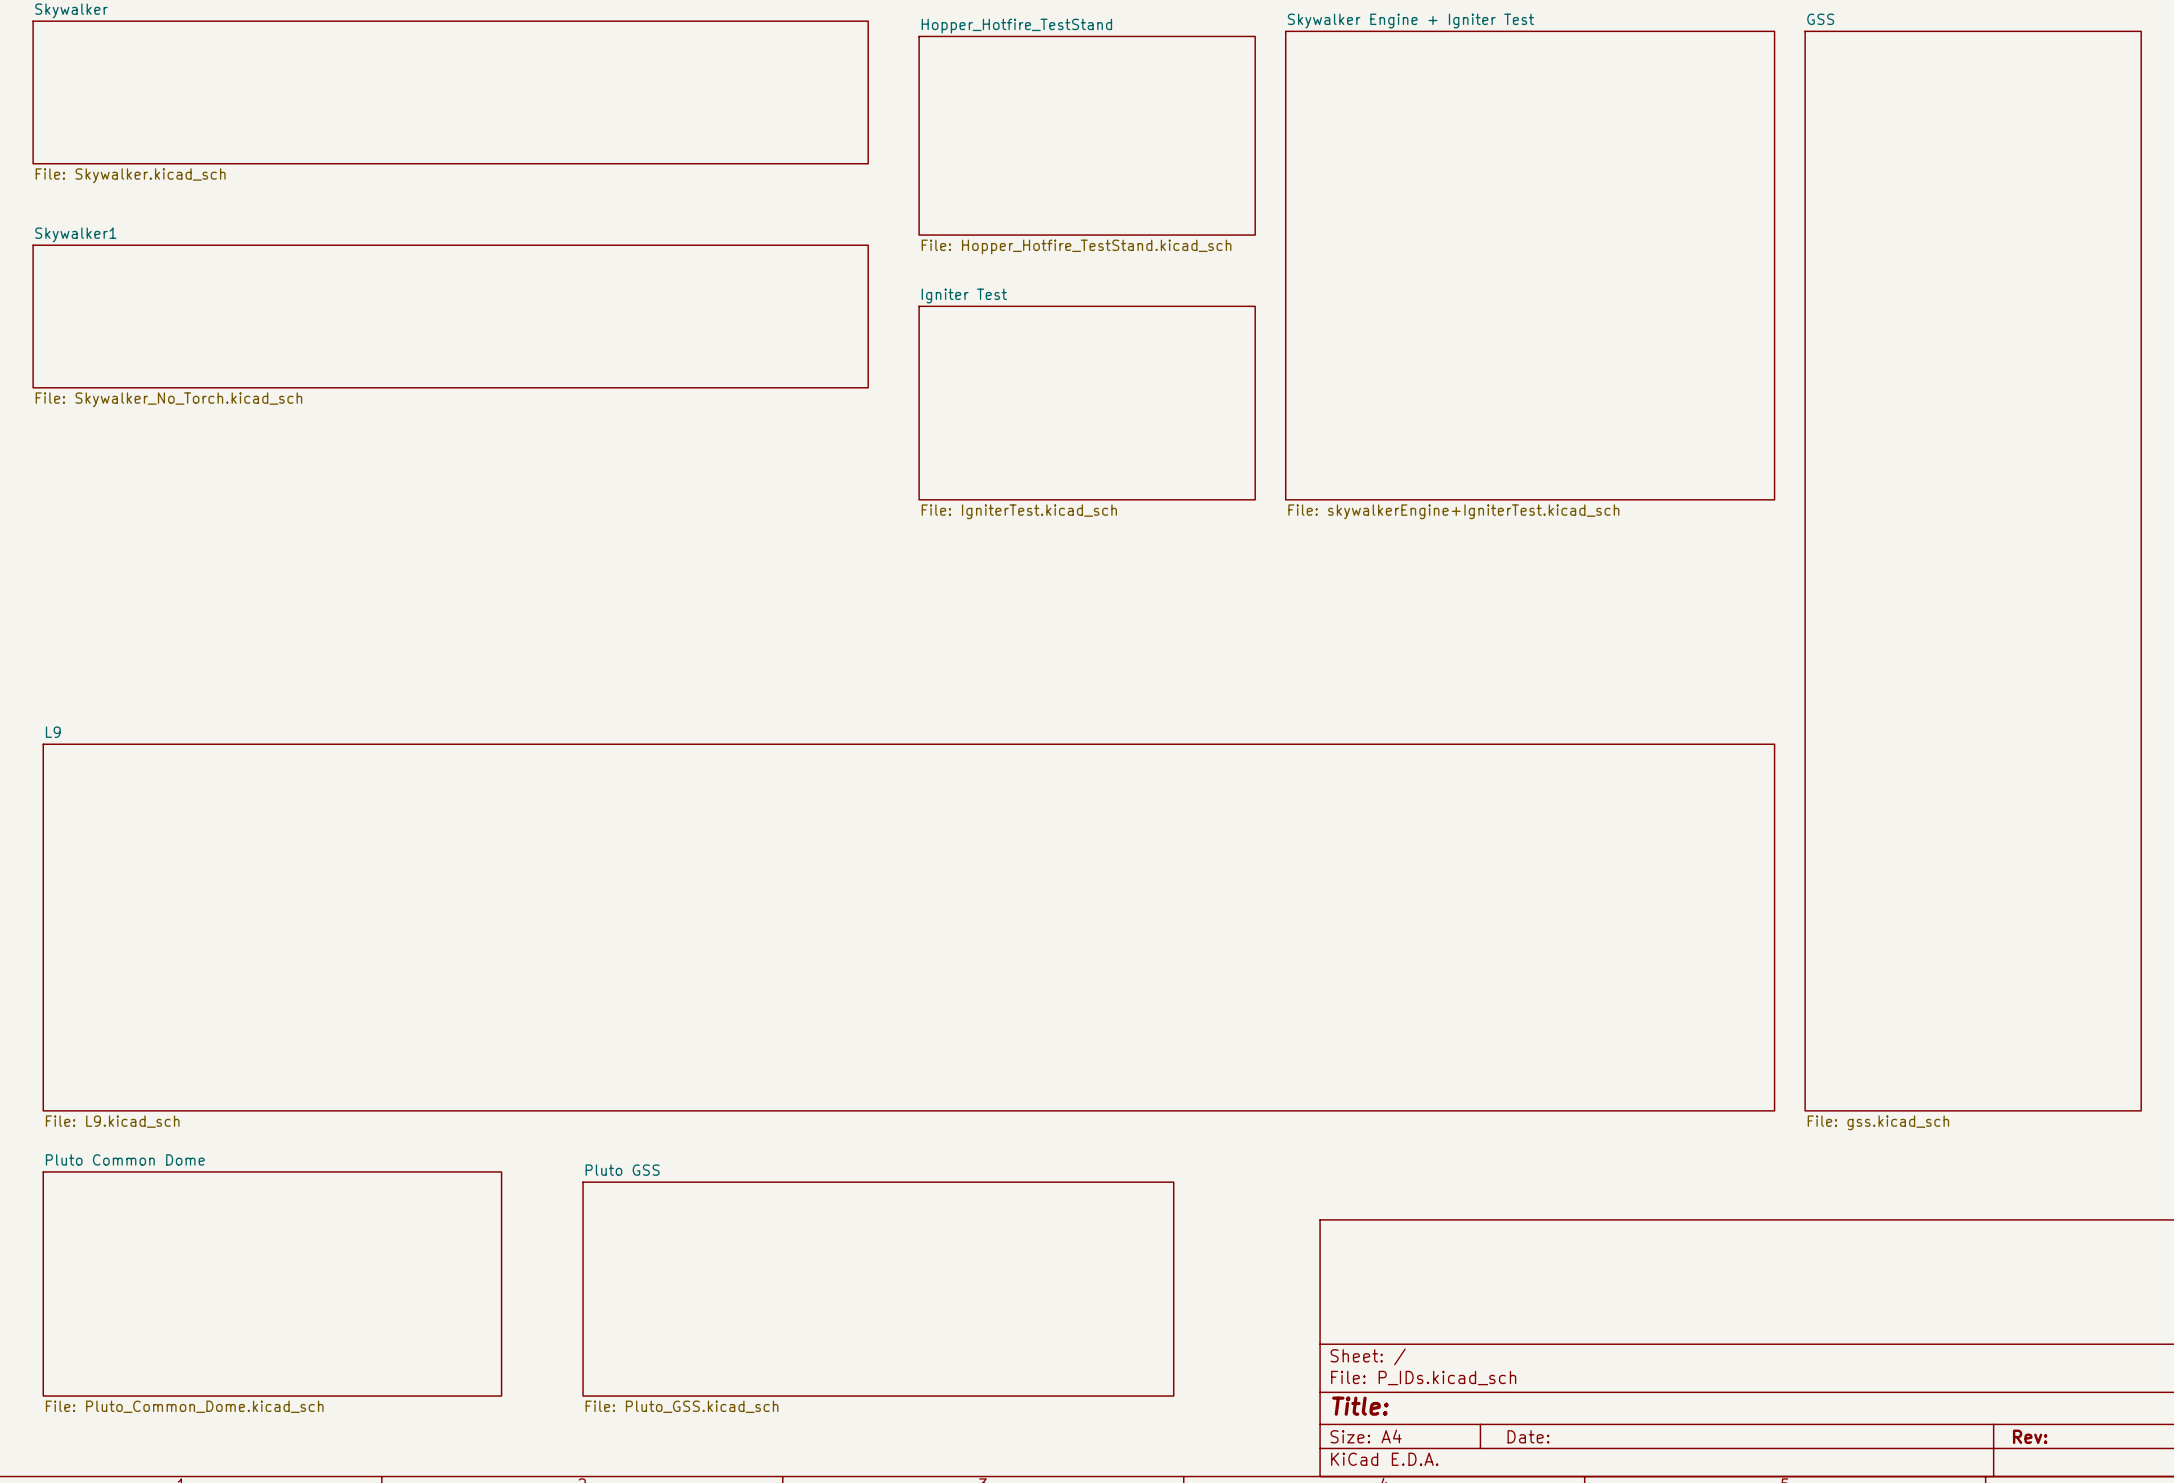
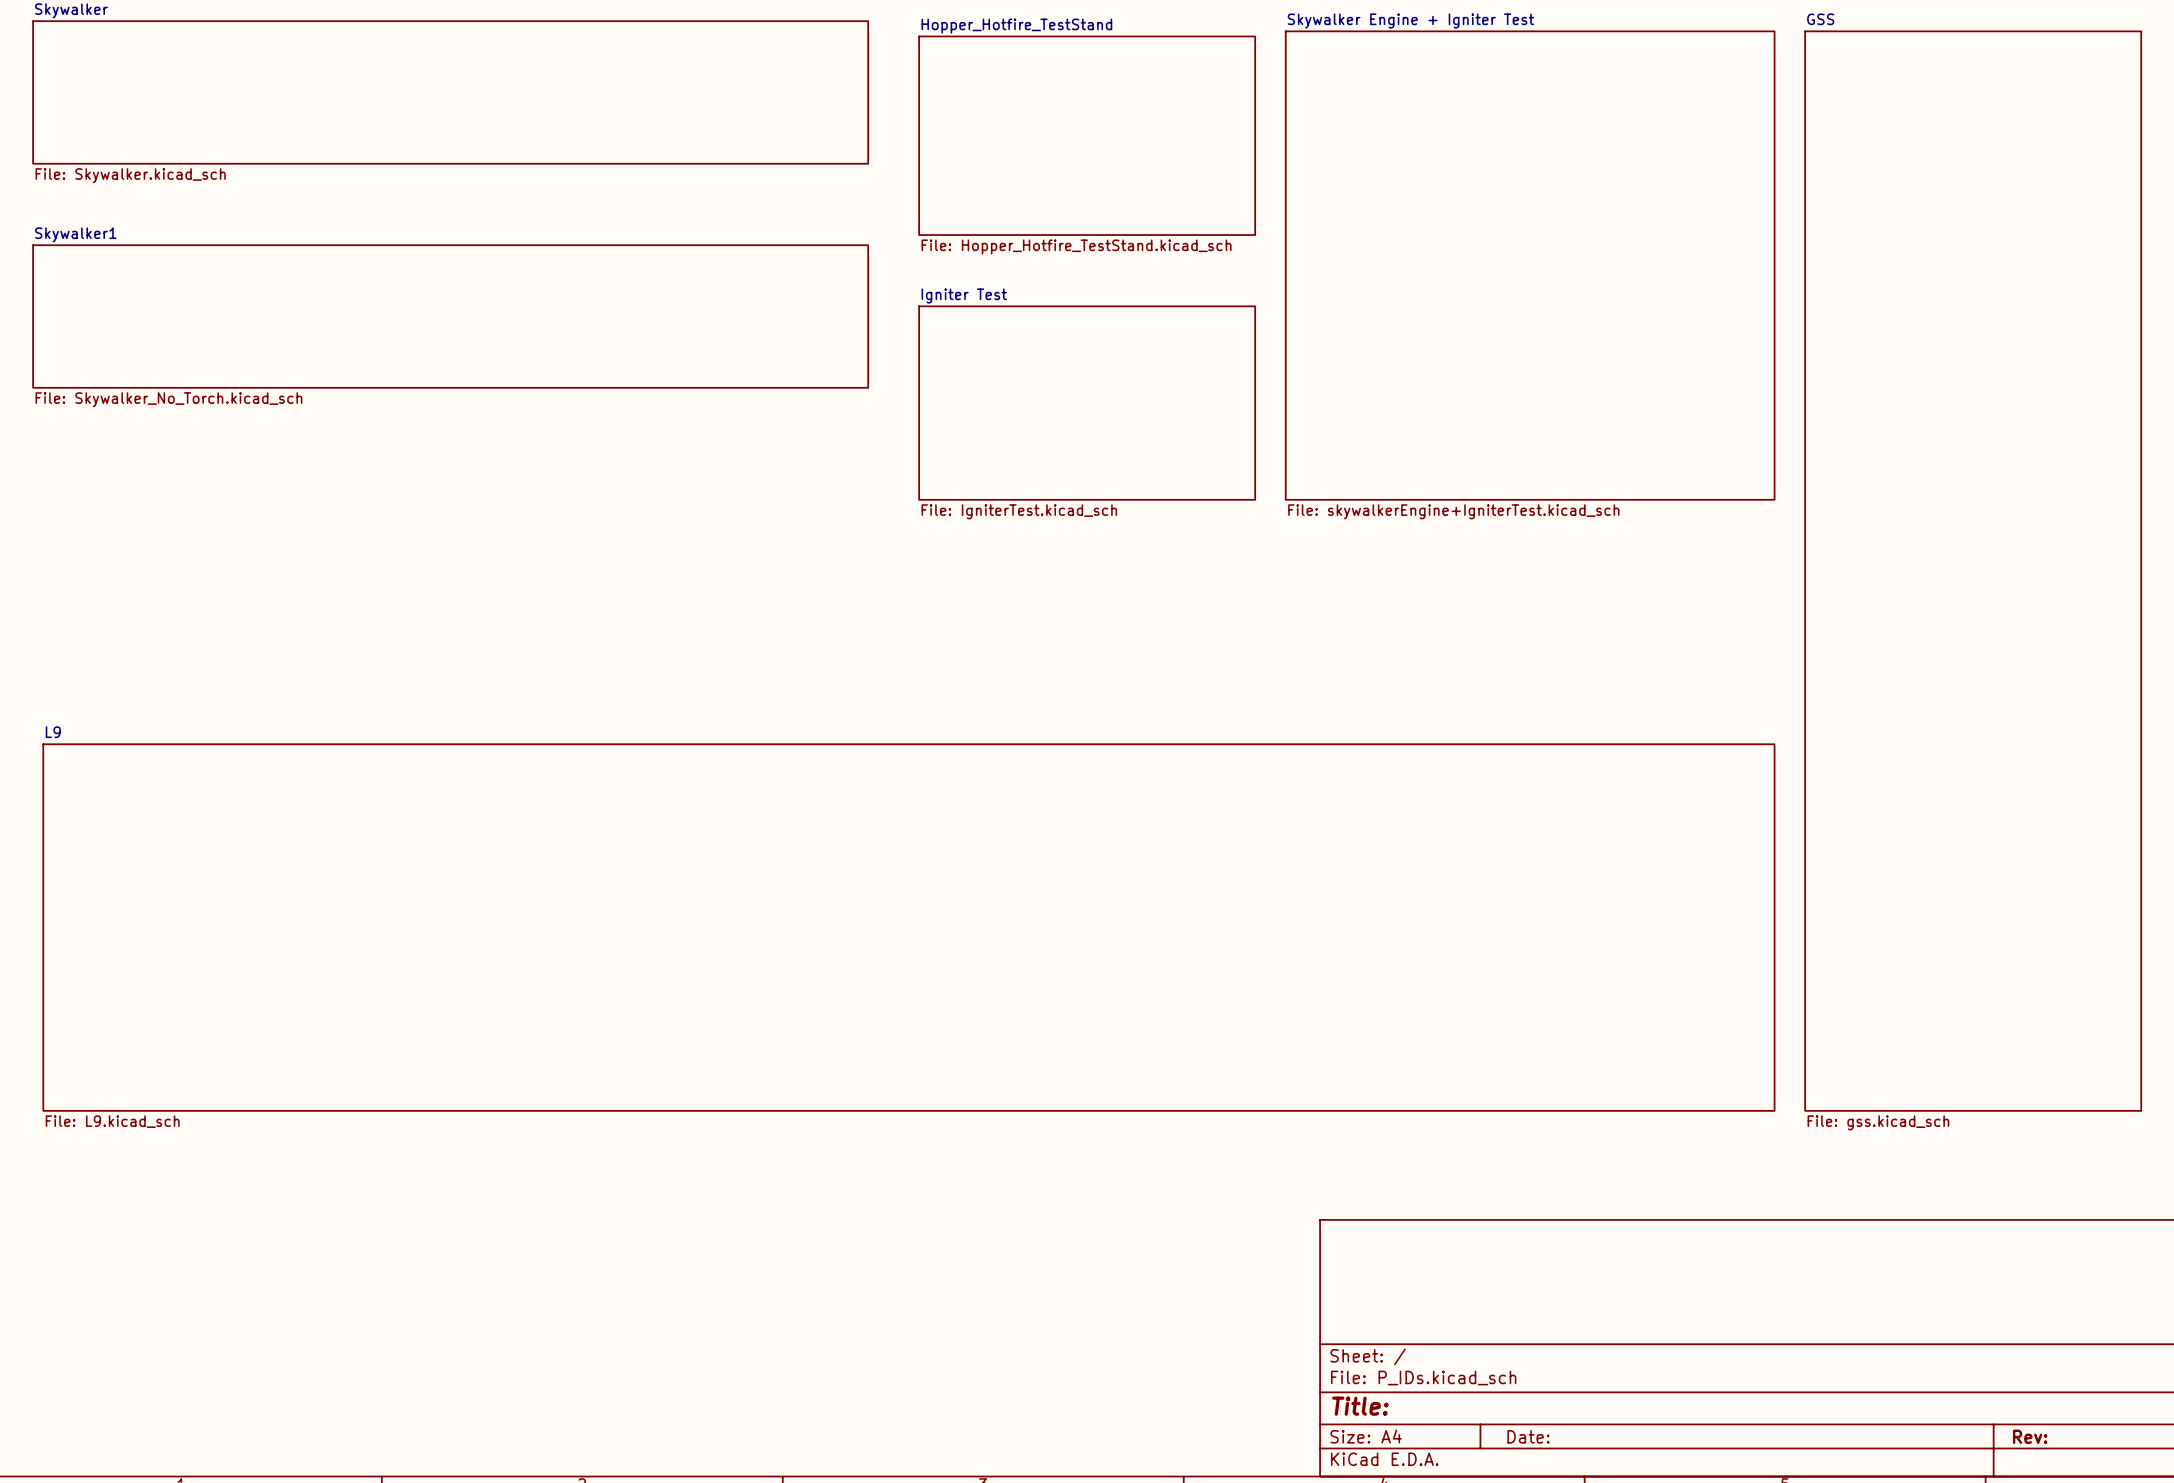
sheet Pluto Common Dome: File: Pluto_Common_Dome.kicad_sch (272, 1284) -> none
sheet Pluto GSS: File: Pluto_GSS.kicad_sch (878, 1289) -> none

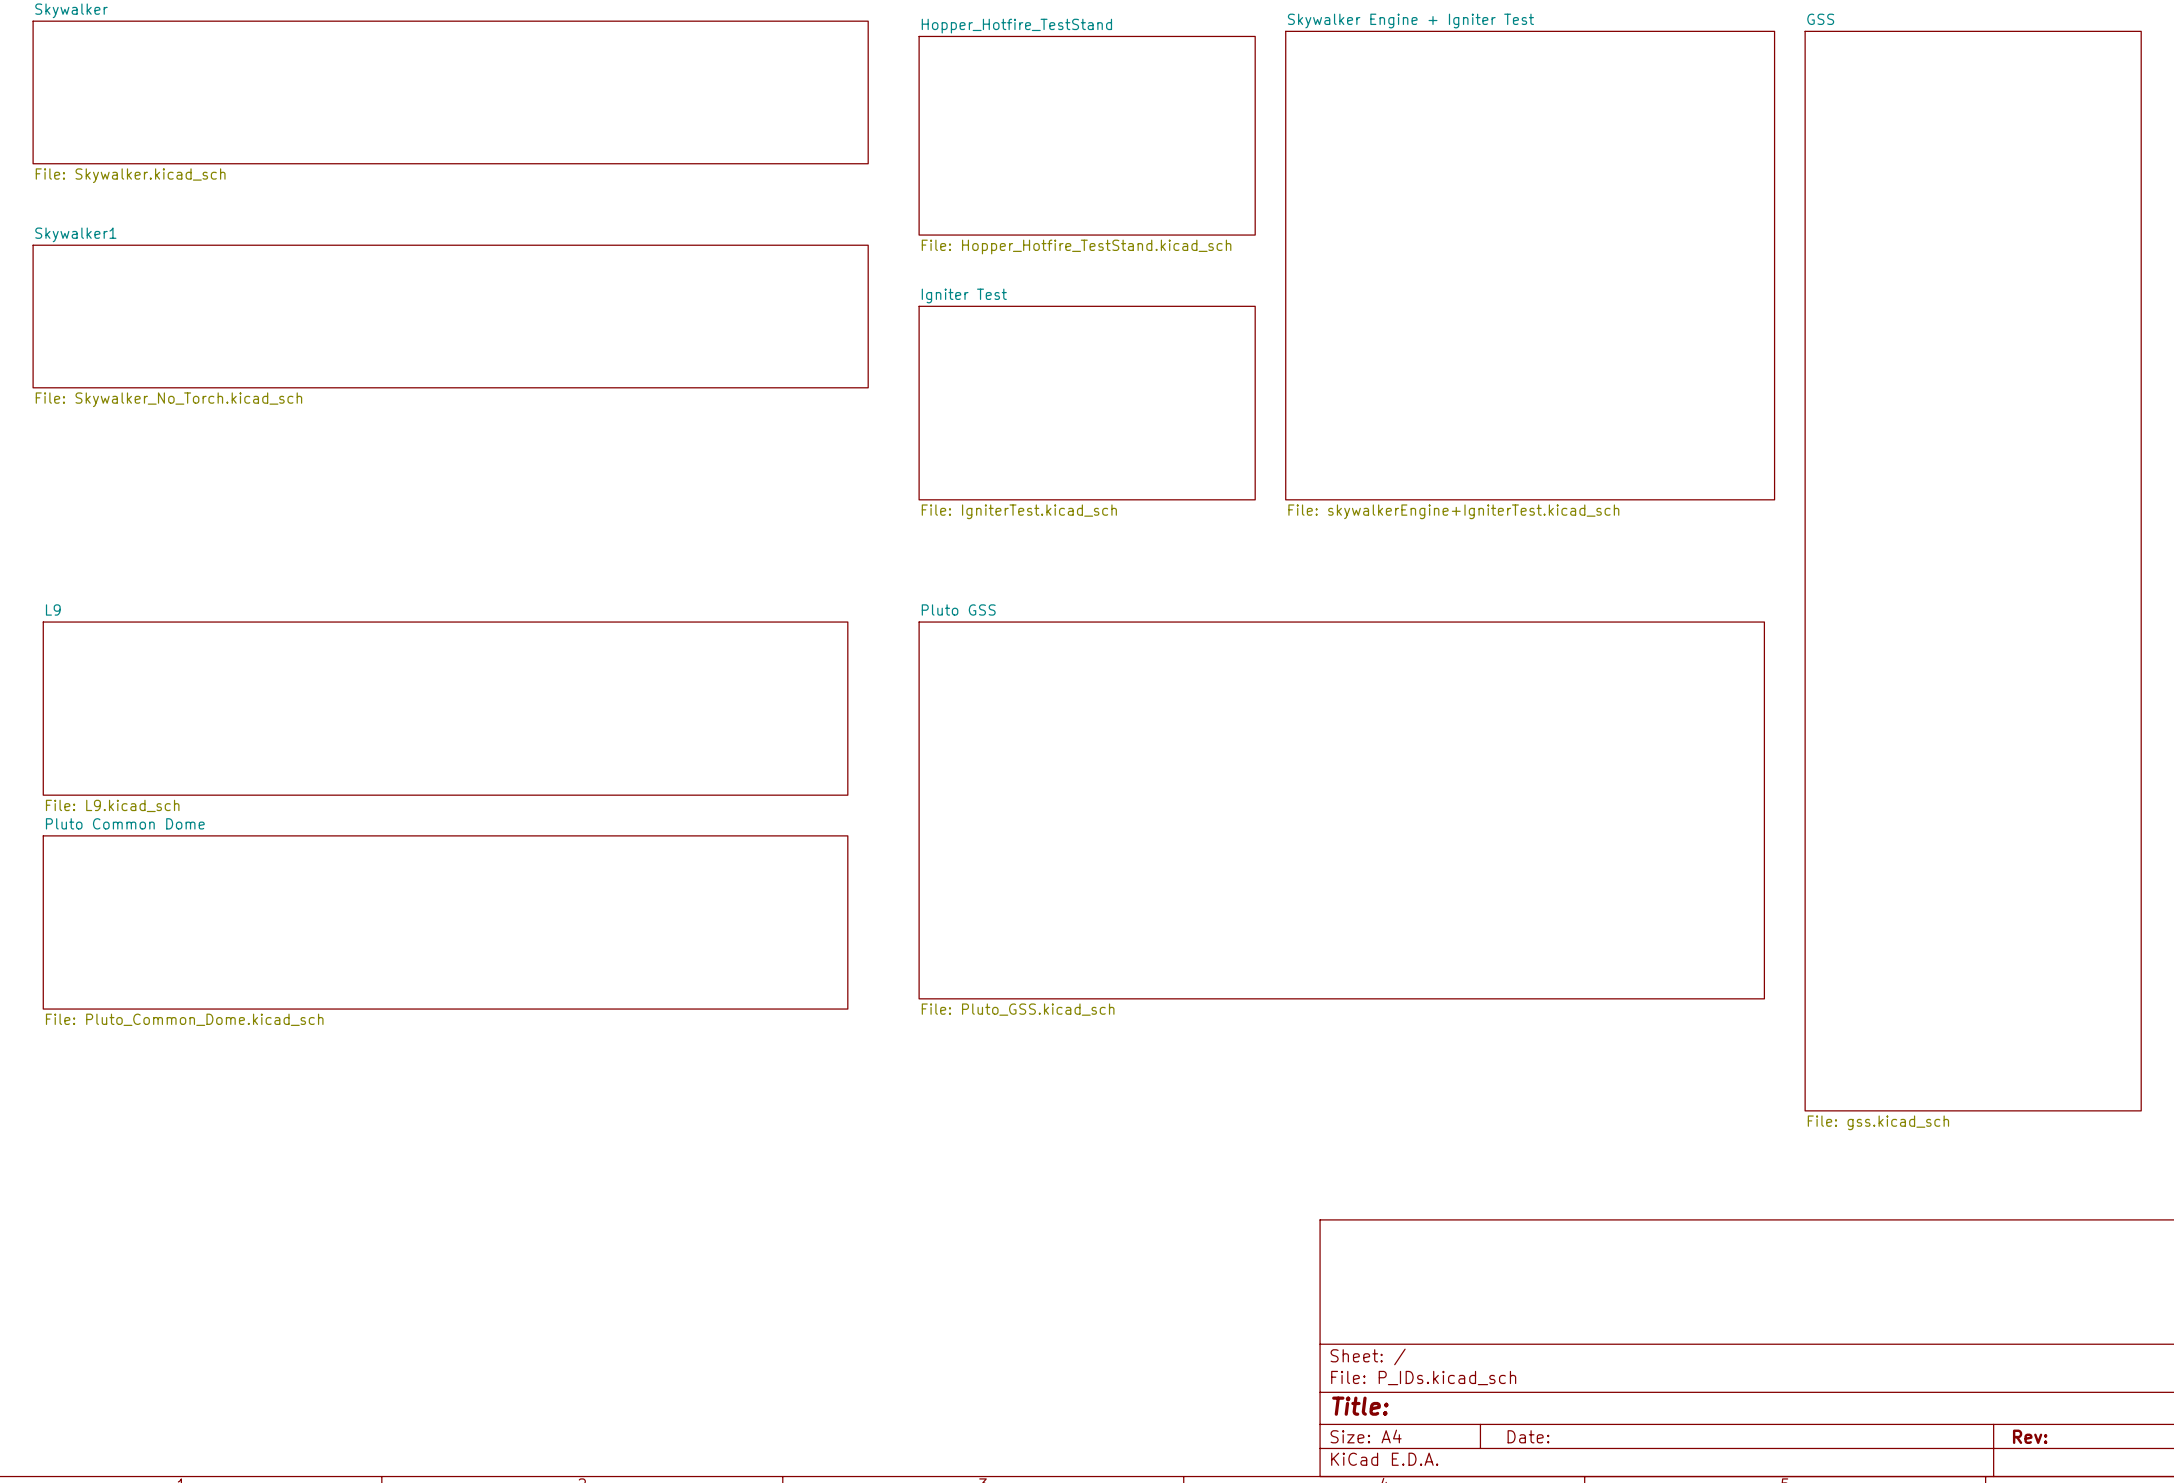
sheet L9 name position: L9 (53, 732) -> L9 (53, 609)
sheet L9 shape: [42, 743, 1776, 1112] -> [42, 621, 849, 796]
sheet Pluto GSS: none -> File: Pluto_GSS.kicad_sch (1341, 810)
sheet Pluto Common Dome: none -> File: Pluto_Common_Dome.kicad_sch (445, 922)
sheet L9 value position: File: L9.kicad_sch (112, 1121) -> File: L9.kicad_sch (112, 805)

